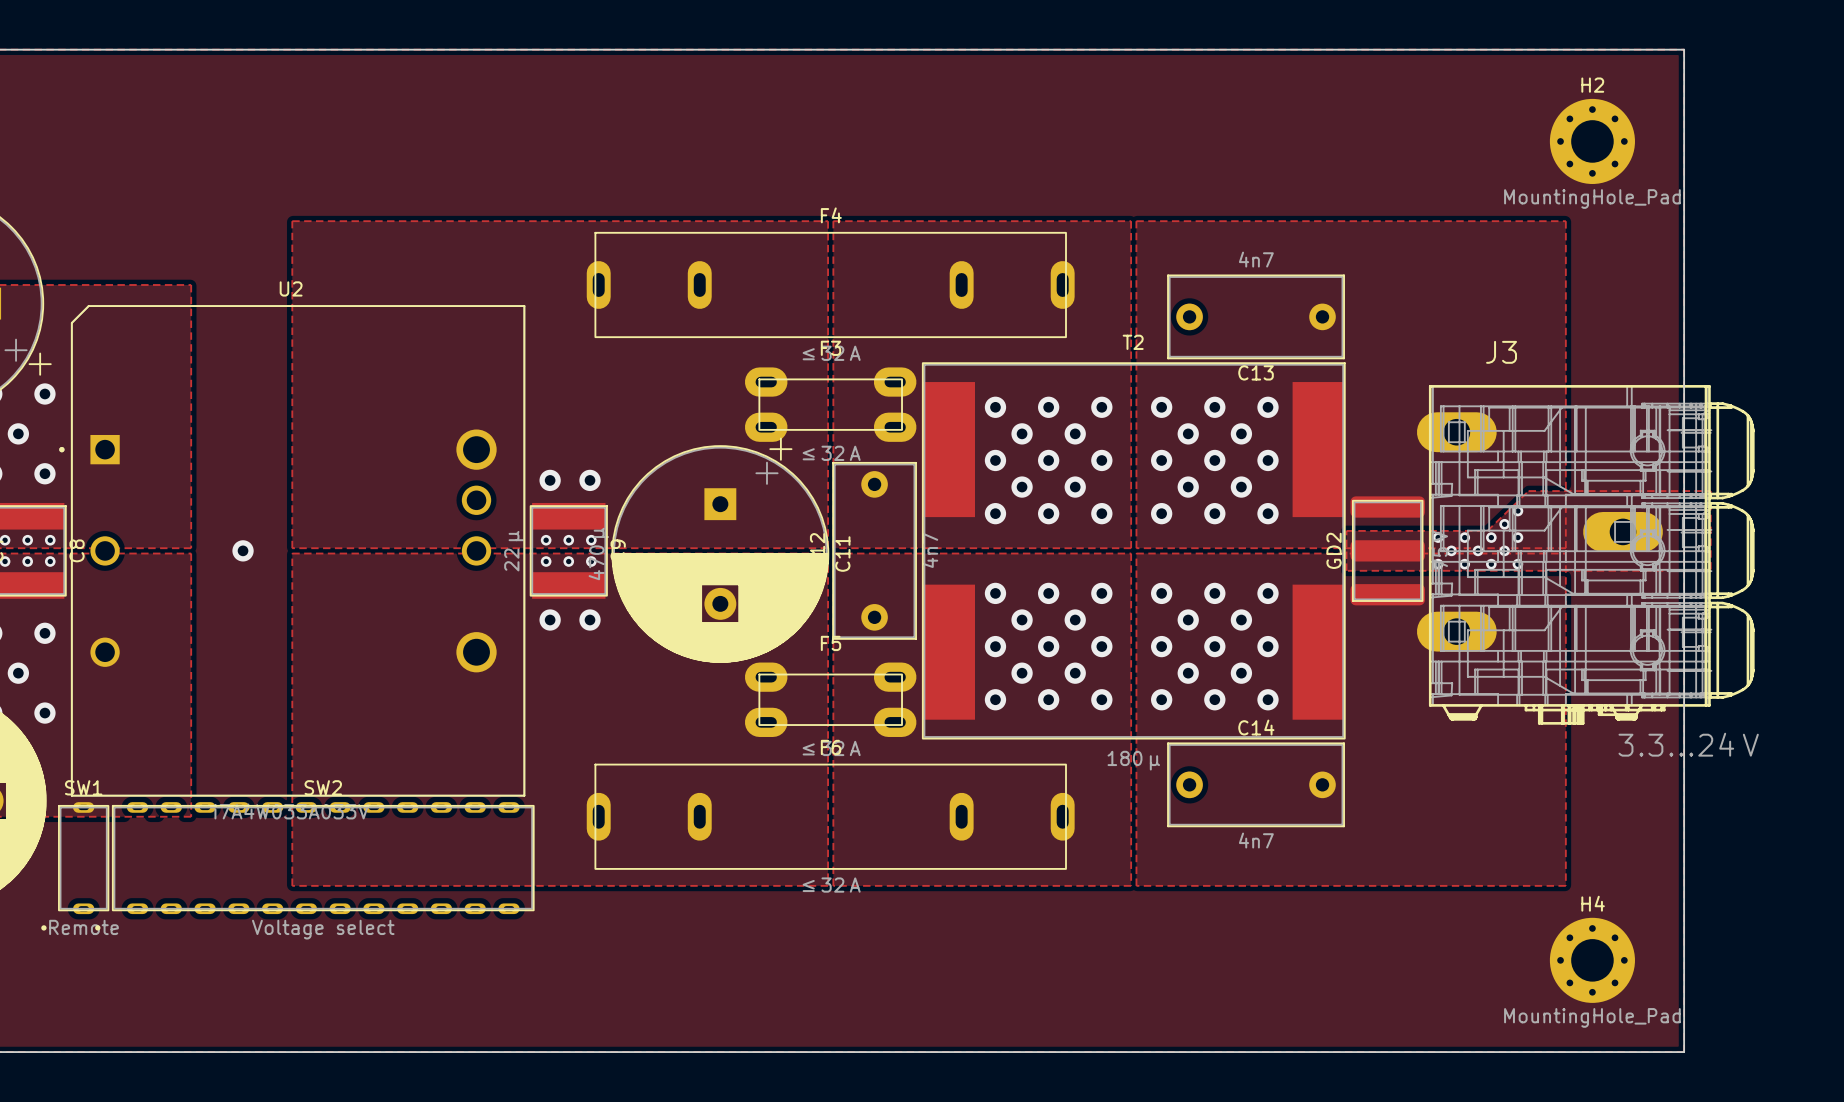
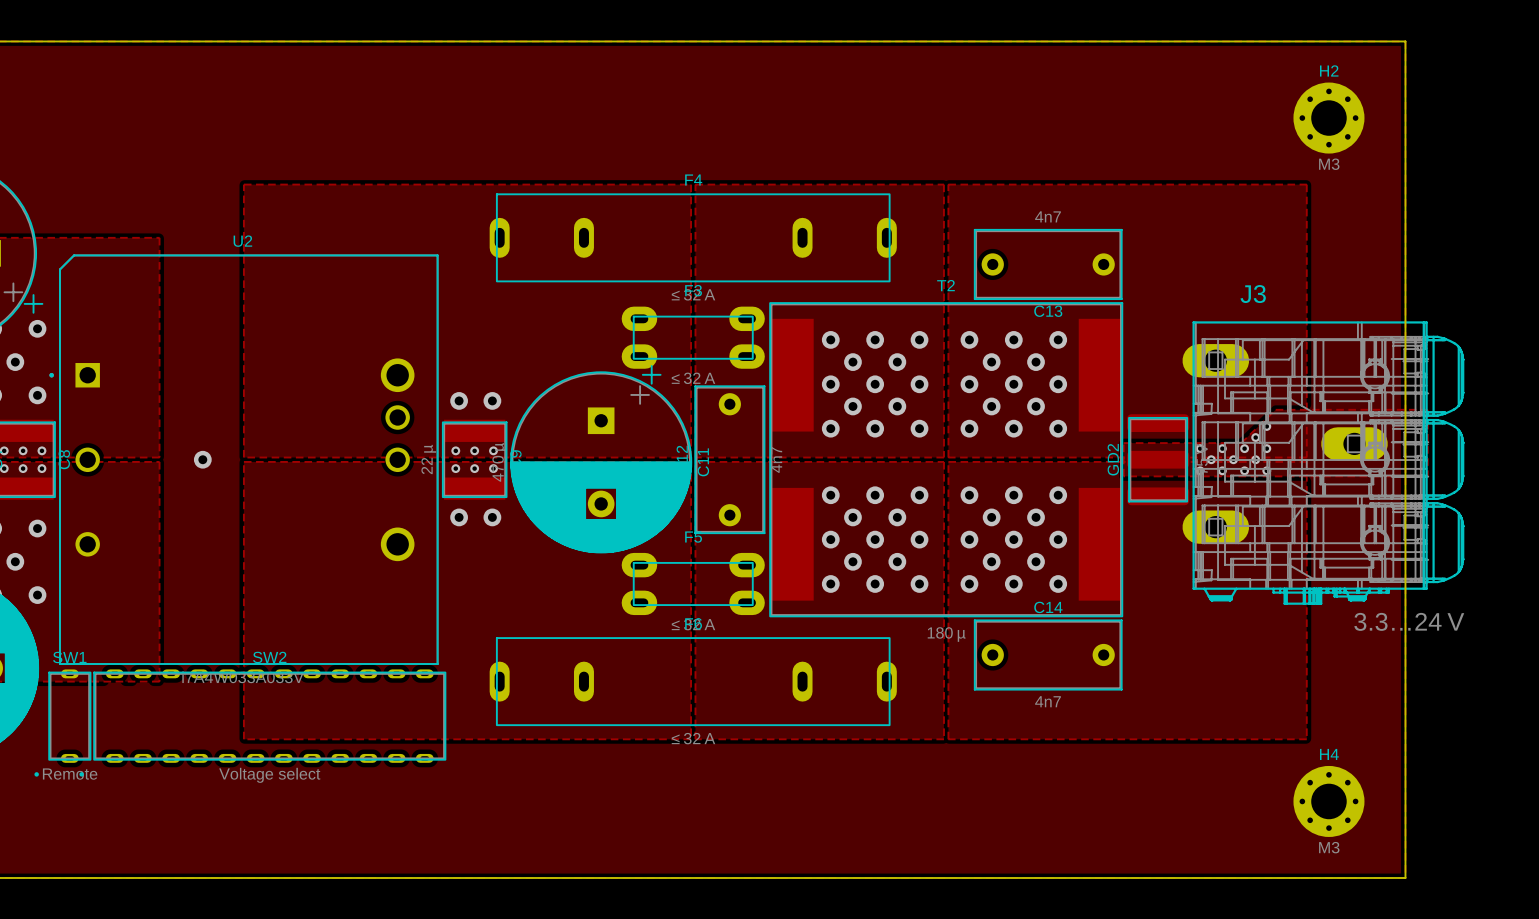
H2 value: MountingHole_Pad (1592, 199) -> M3 (1329, 164)
H4 value: MountingHole_Pad (1592, 1017) -> M3 (1329, 847)

